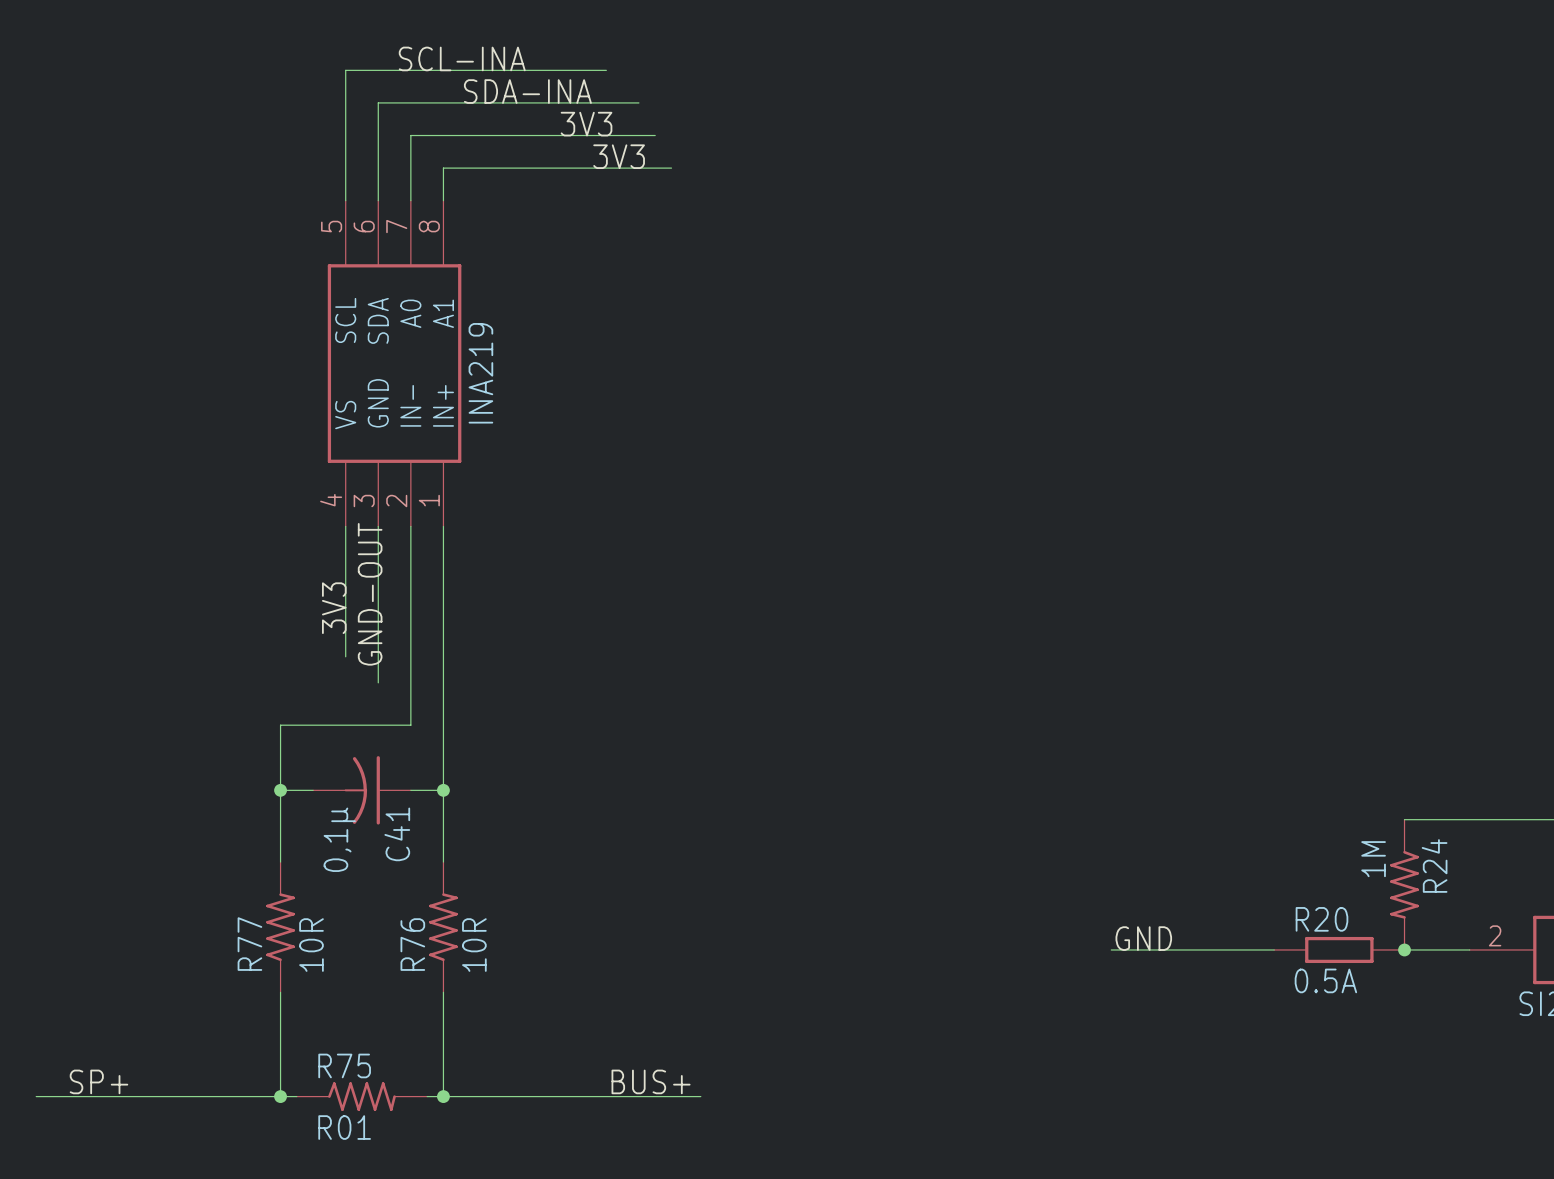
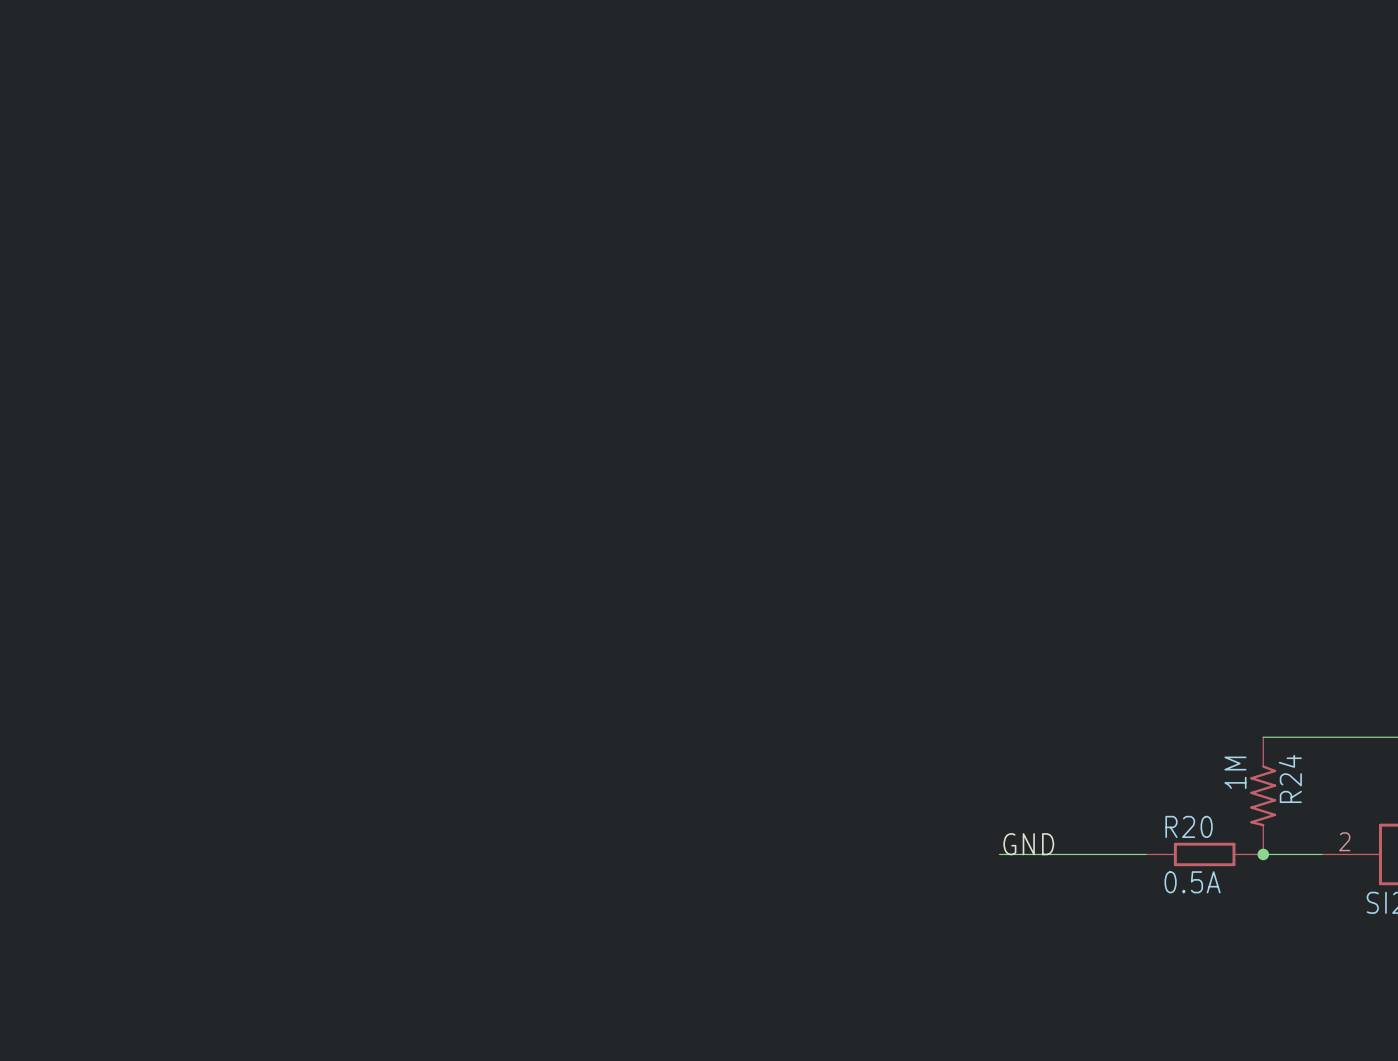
label: SCL-INA (462, 58) -> none
wire: (606, 70) (345, 70) (345, 200) -> none
label: SDA-INA (527, 91) -> none
wire: (638, 102) (378, 102) (378, 200) -> none
label: 3V3 (586, 124) -> none
wire: (655, 135) (410, 135) (410, 200) -> none
label: 3V3 (619, 156) -> none
wire: (671, 168) (443, 168) (443, 200) -> none
part: (394, 363) -> none
wire: (345, 526) (345, 656) -> none
wire: (378, 526) (378, 682) -> none
wire: (410, 526) (410, 725) (280, 725) (280, 862) -> none
wire: (443, 526) (443, 862) -> none
label: GND-OUT (370, 594) -> none
label: 3V3 (334, 608) -> none
wire: (280, 790) (313, 790) -> none
junction: (280, 790) -> none
C41: 0,1µ (361, 790) -> none
wire: (410, 790) (443, 790) -> none
junction: (443, 790) -> none
R77: 10R (280, 927) -> none
R76: 10R (443, 927) -> none
wire: (280, 992) (280, 1096) -> none
wire: (443, 992) (443, 1096) -> none
label: SP+ (98, 1081) -> none
label: BUS+ (651, 1081) -> none
wire: (36, 1096) (296, 1096) -> none
junction: (280, 1096) -> none
R75: R01 (361, 1096) -> none
wire: (427, 1096) (700, 1096) -> none
junction: (443, 1096) -> none

